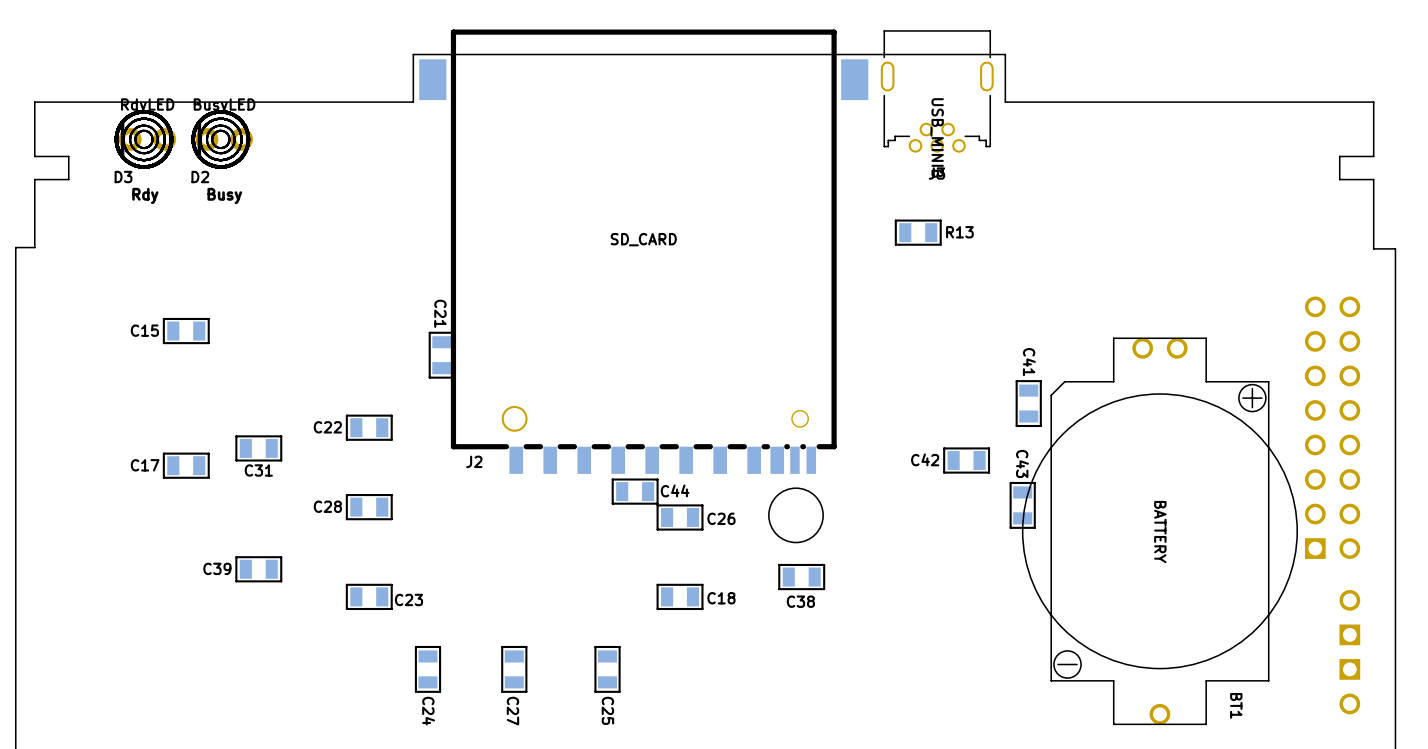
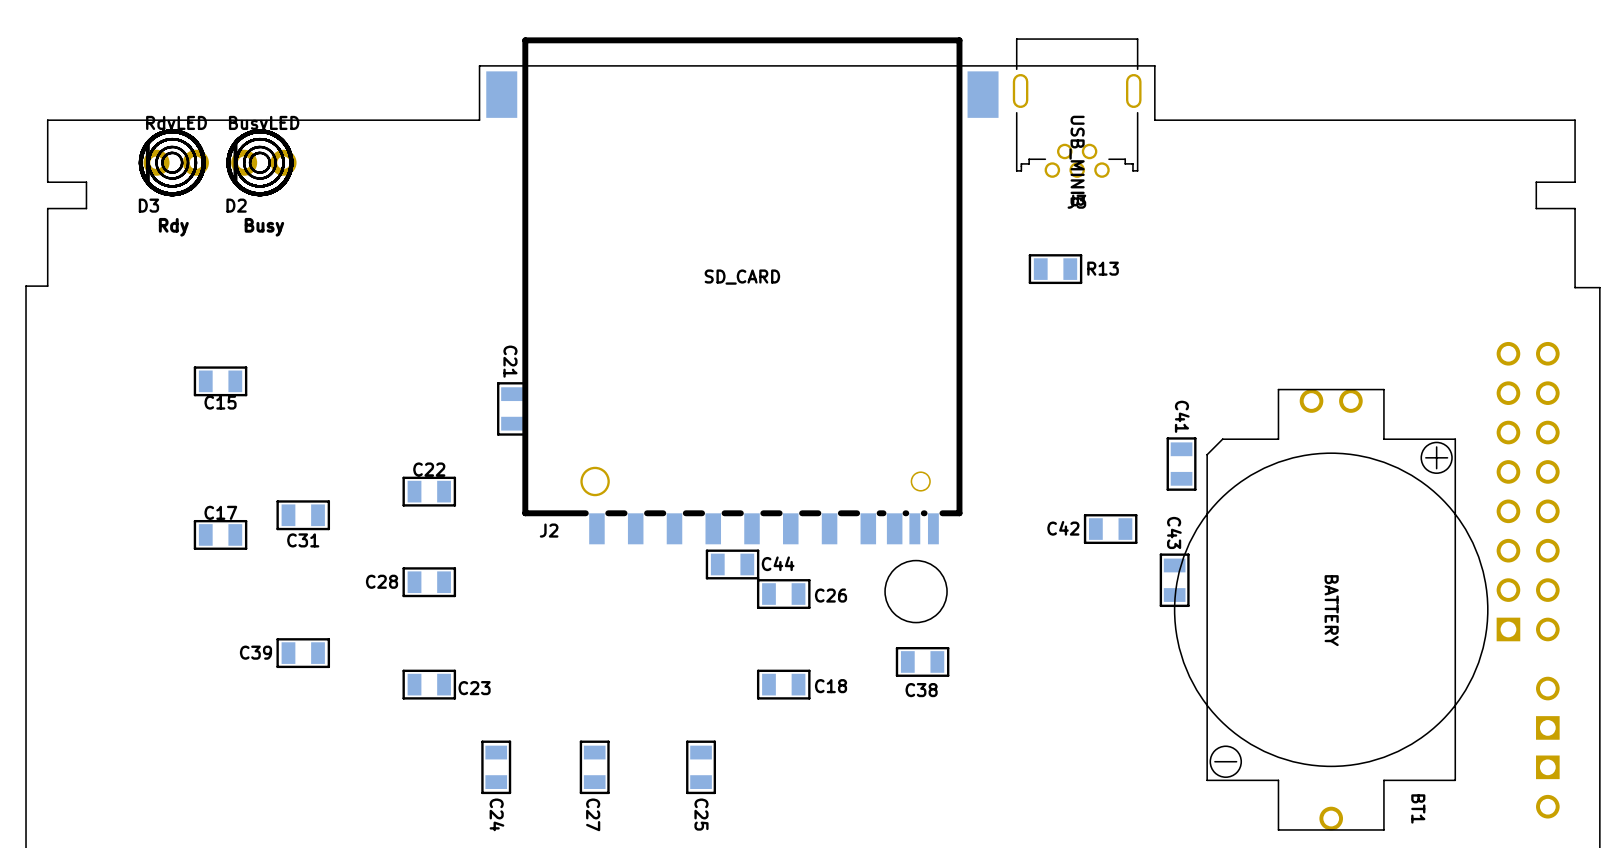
C15 name position: C15 (144, 330) -> C15 (220, 402)
C22 name position: C22 (327, 427) -> C22 (429, 469)
C17 name position: C17 (145, 465) -> C17 (220, 512)

